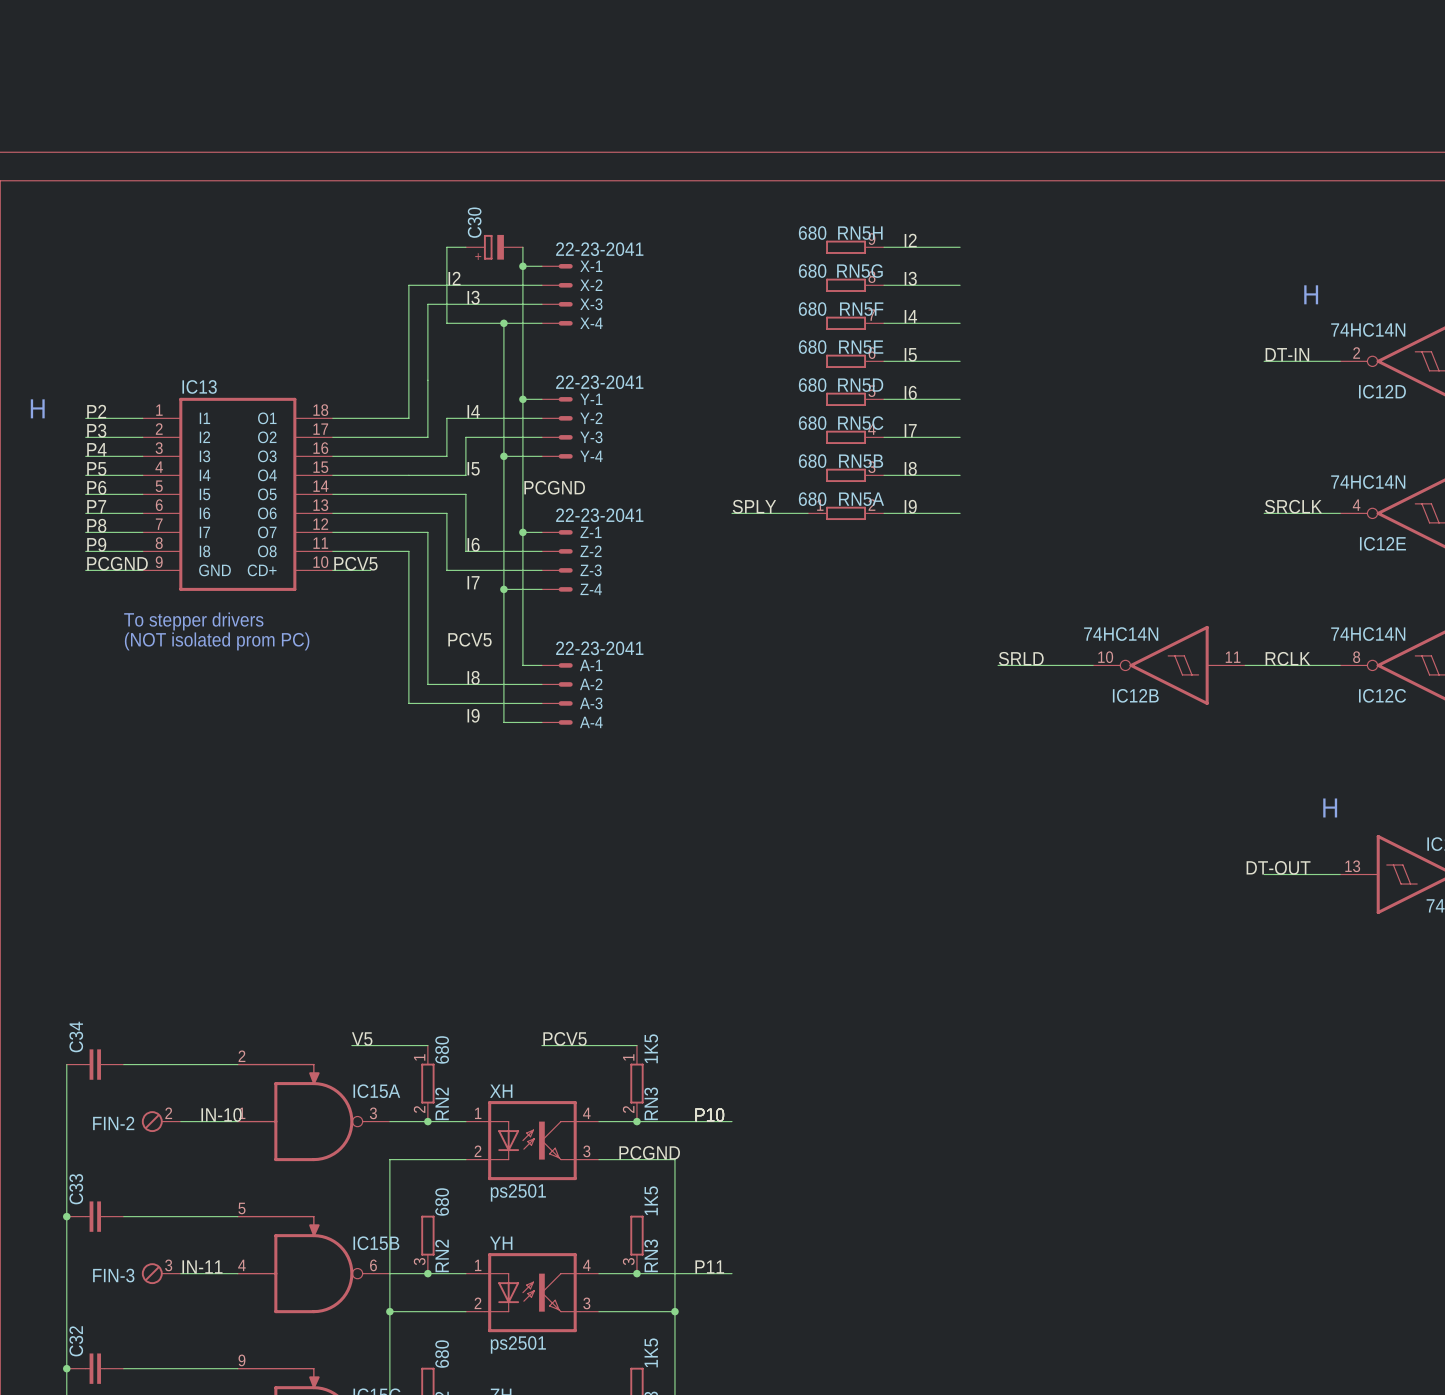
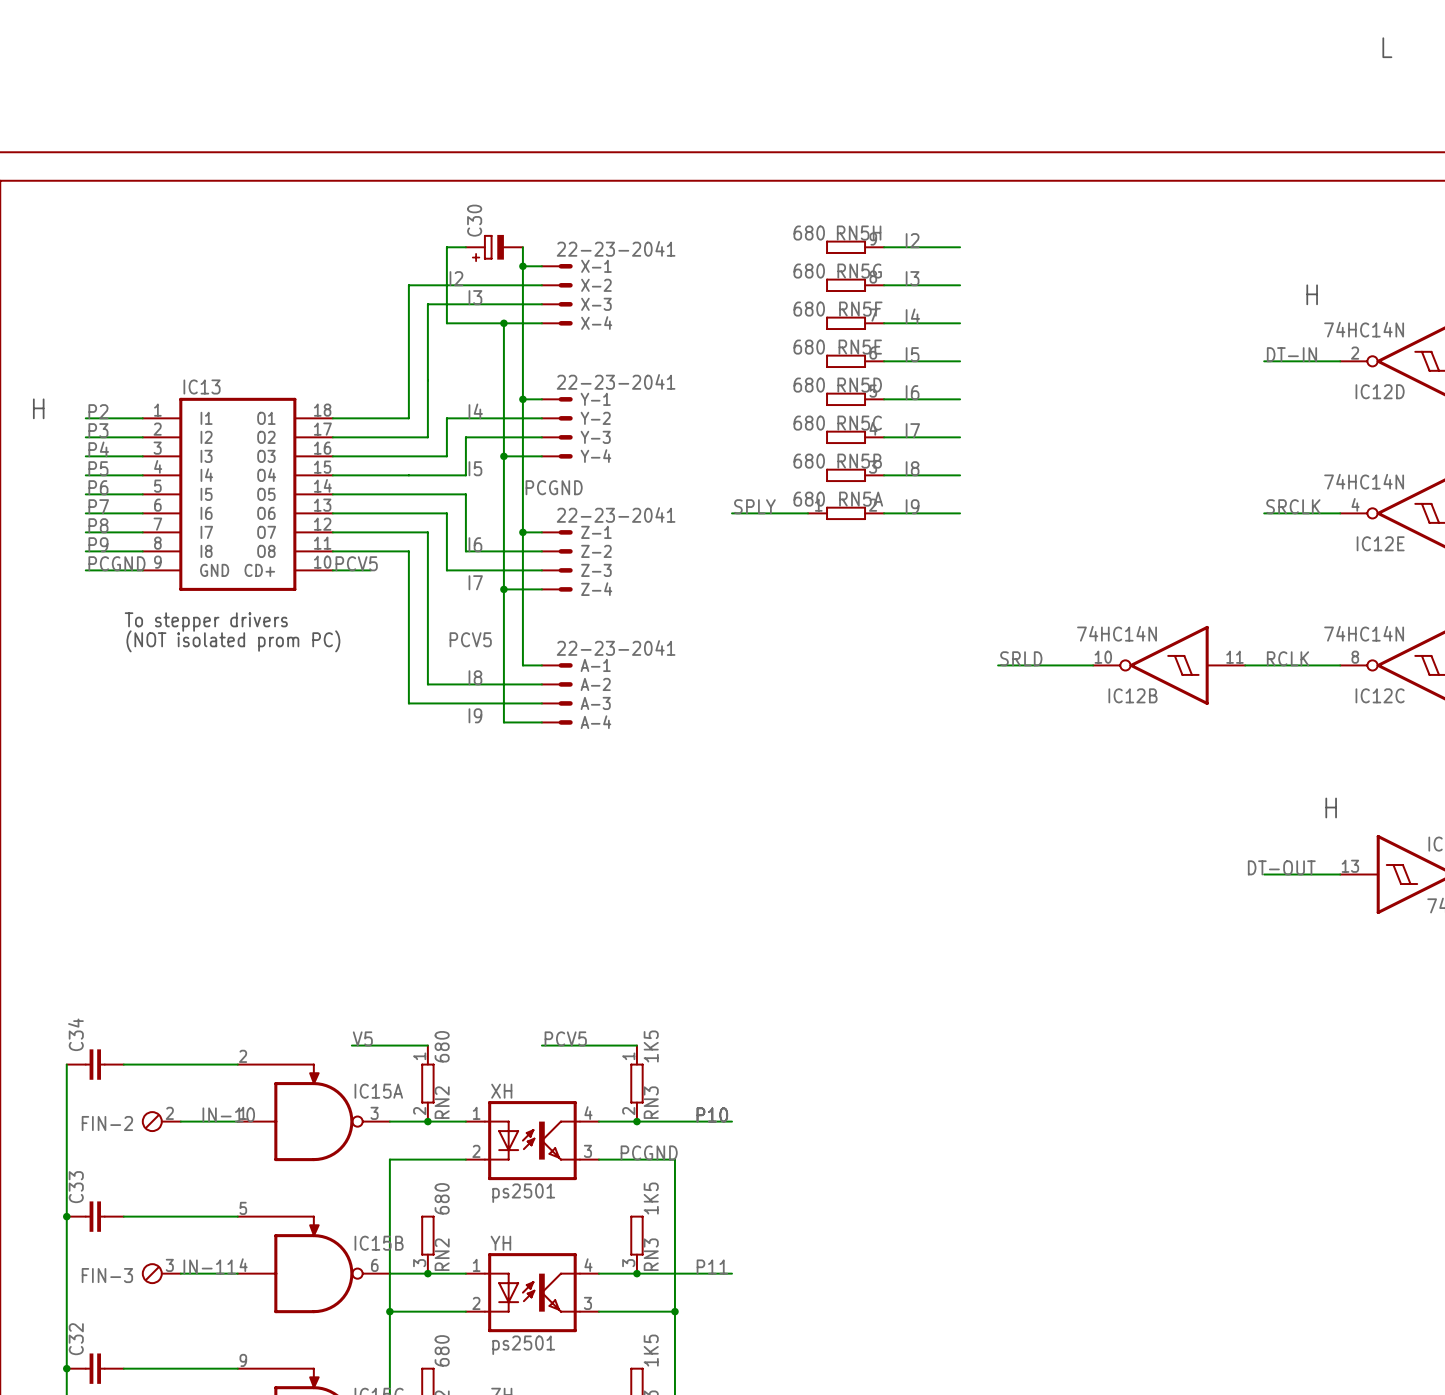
text: none -> L (1387, 47)

